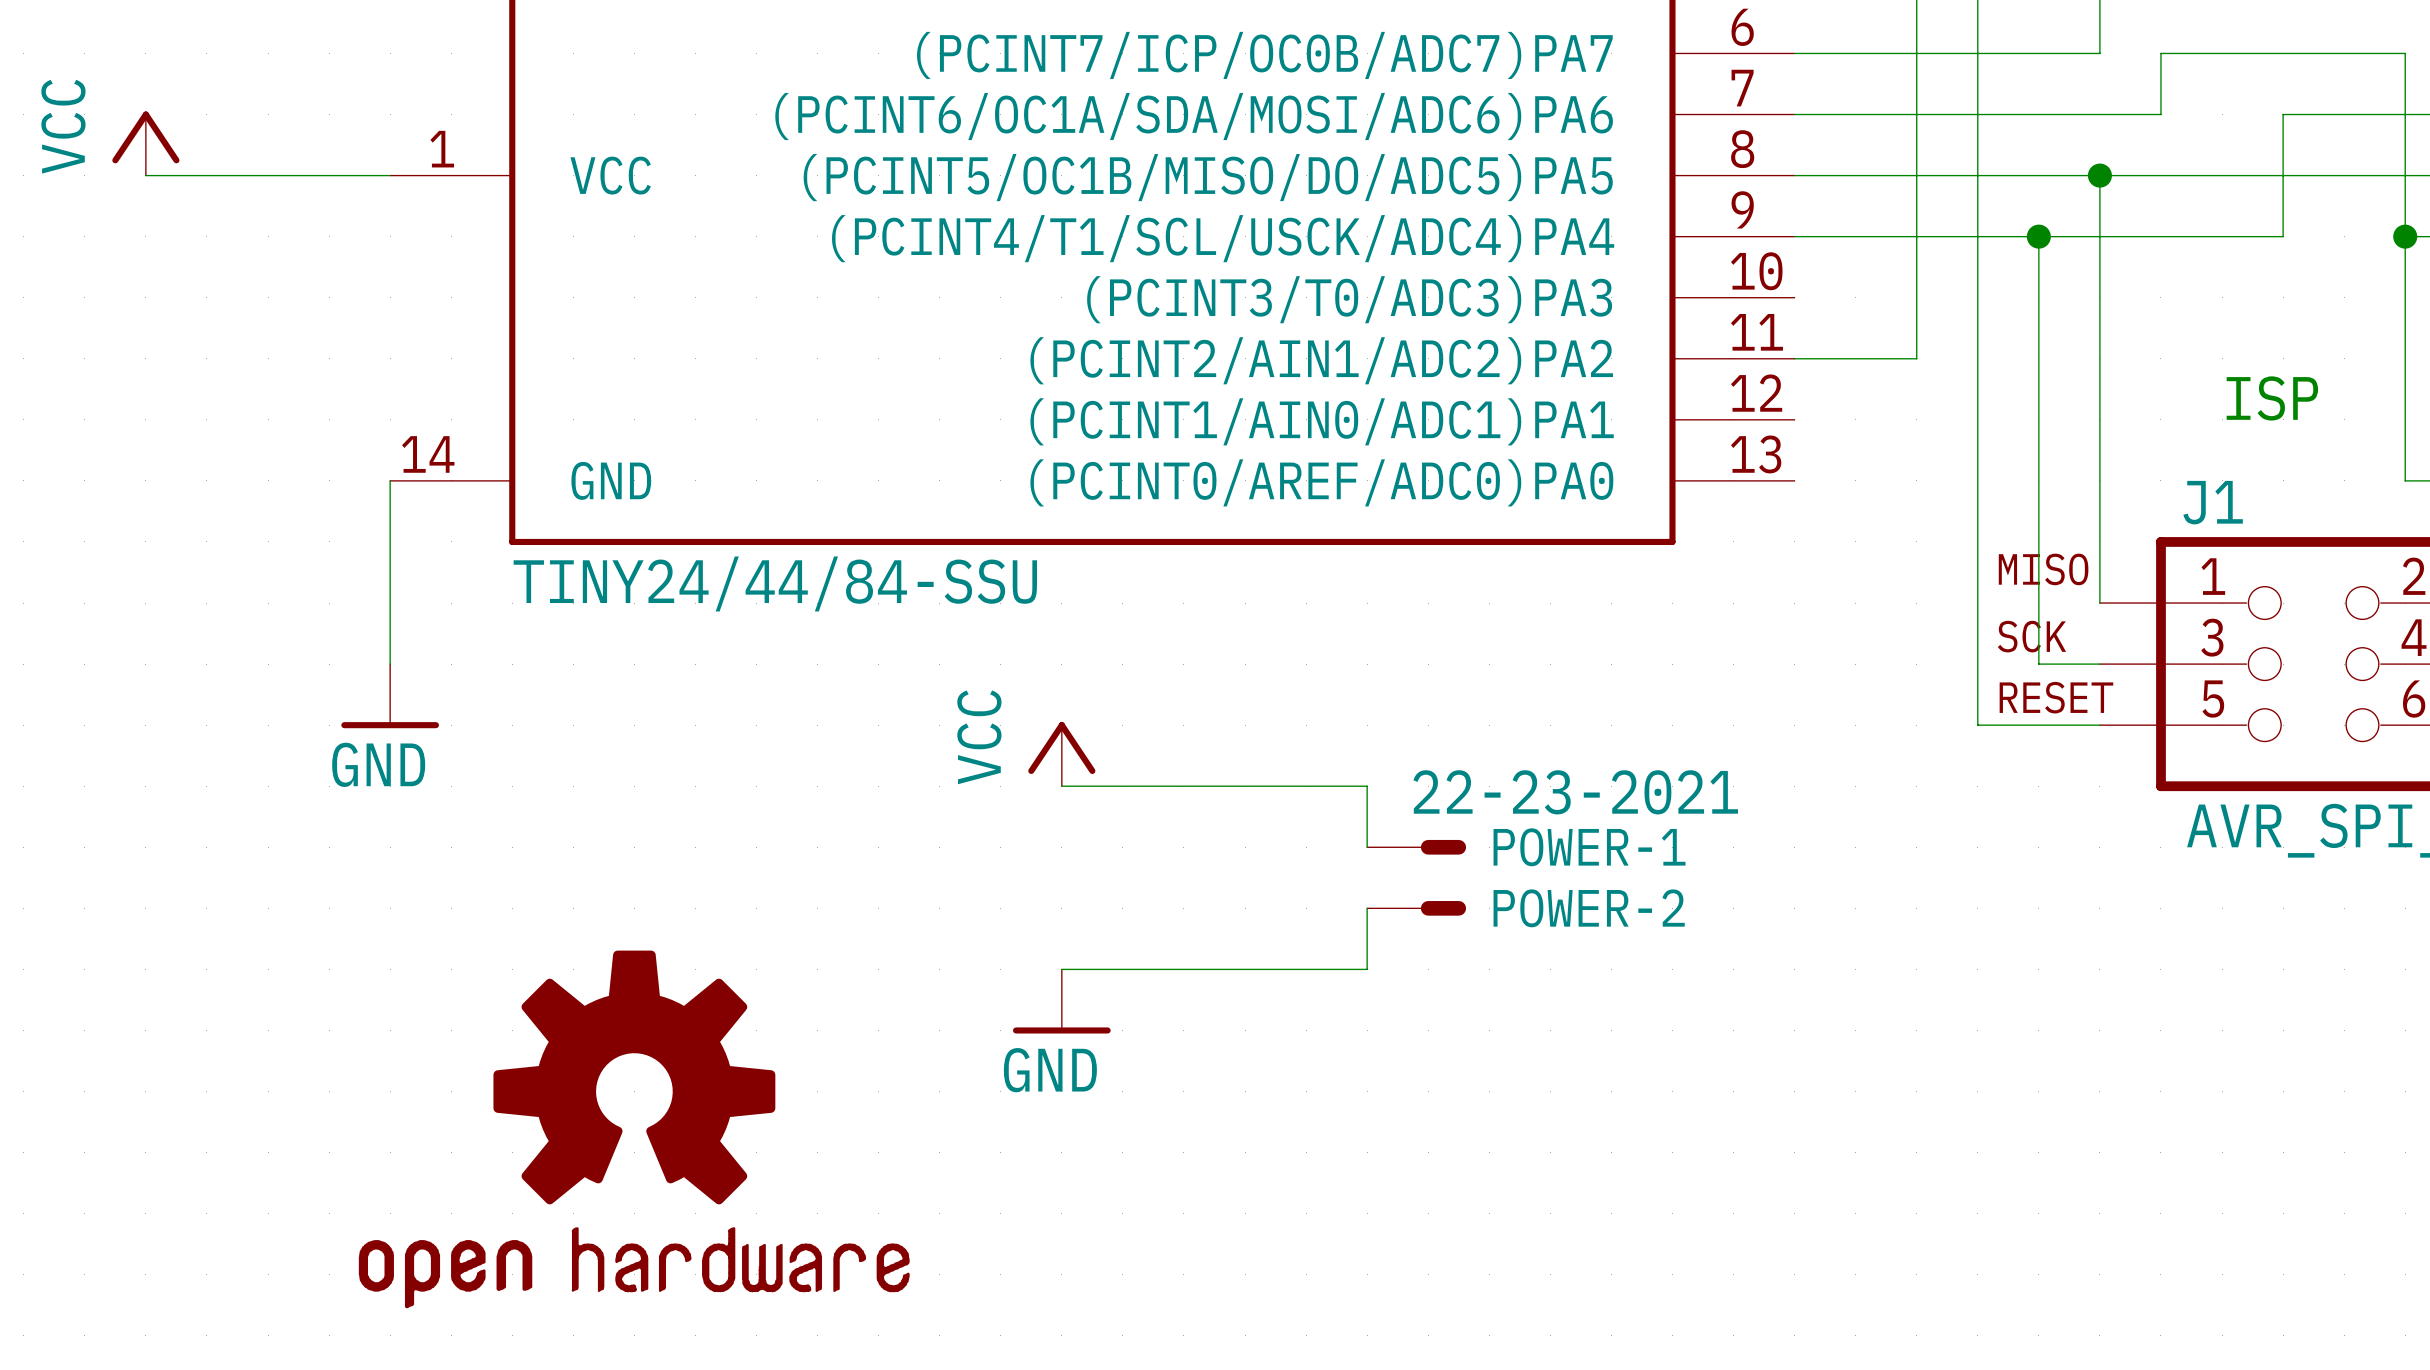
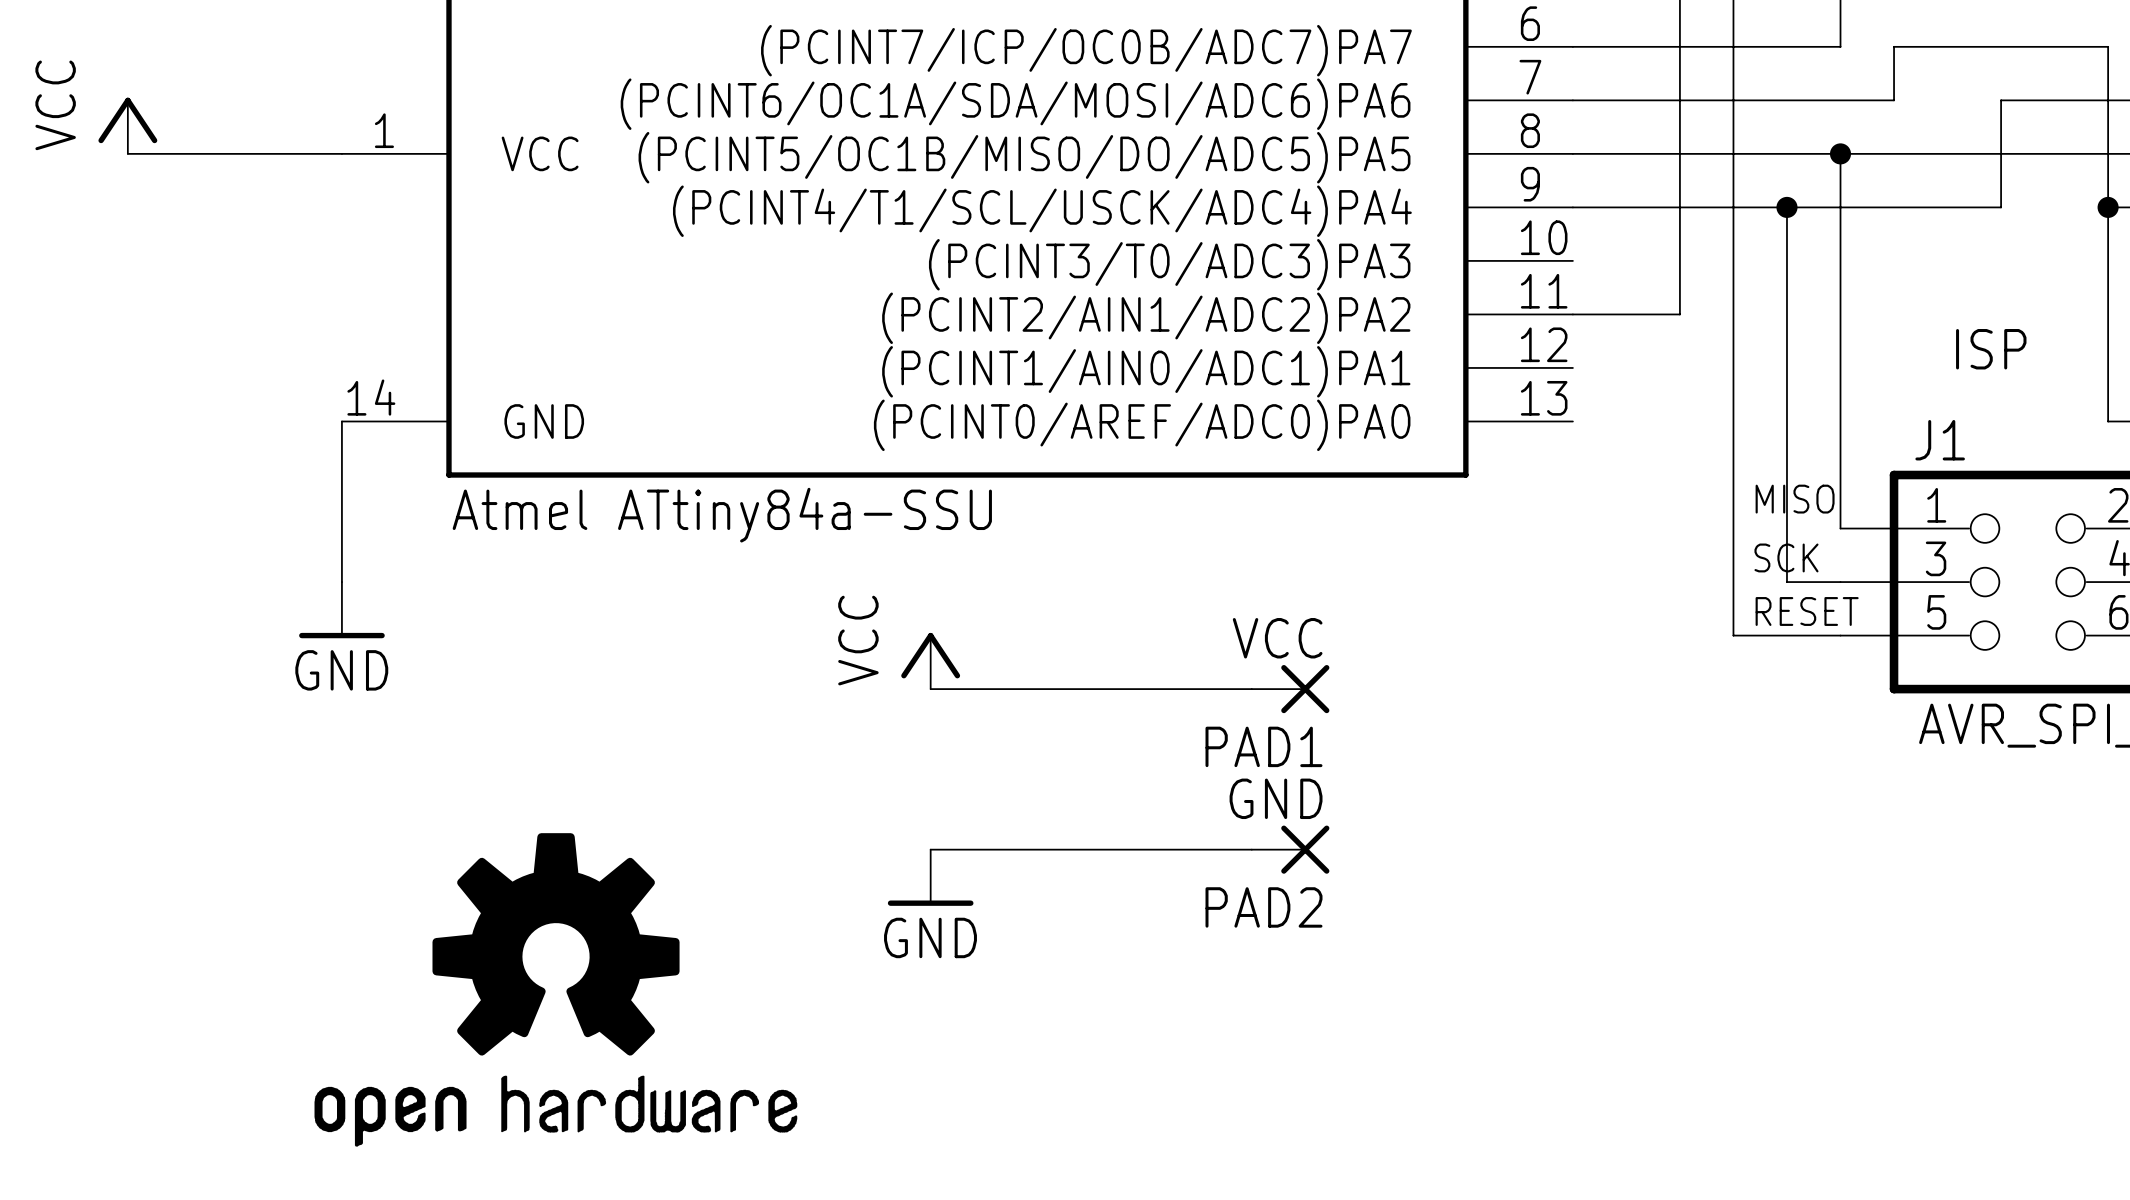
part value: TINY24/44/84-SSU (775, 583) -> Atmel ATtiny84a-SSU (722, 515)
wire: (1367, 786) (1367, 847) -> (1198, 689) (1251, 689)
PAD1: none -> VCC (1290, 689)
POWER-1: 22-23-2021 (1416, 847) -> none
wire: (1367, 908) (1367, 969) -> (1251, 849) (1198, 849)
POWER-2: (1416, 908) -> none
PAD2: none -> GND (1290, 849)

